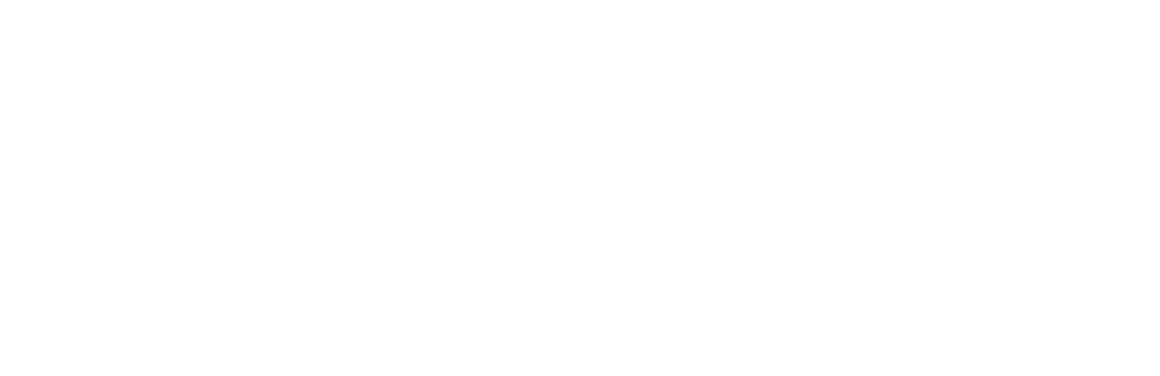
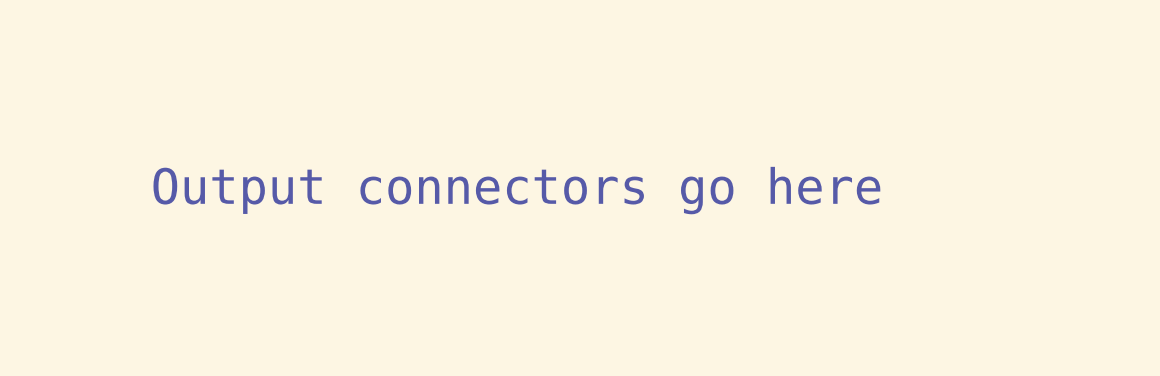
text: none -> Output connectors go here (516, 190)

